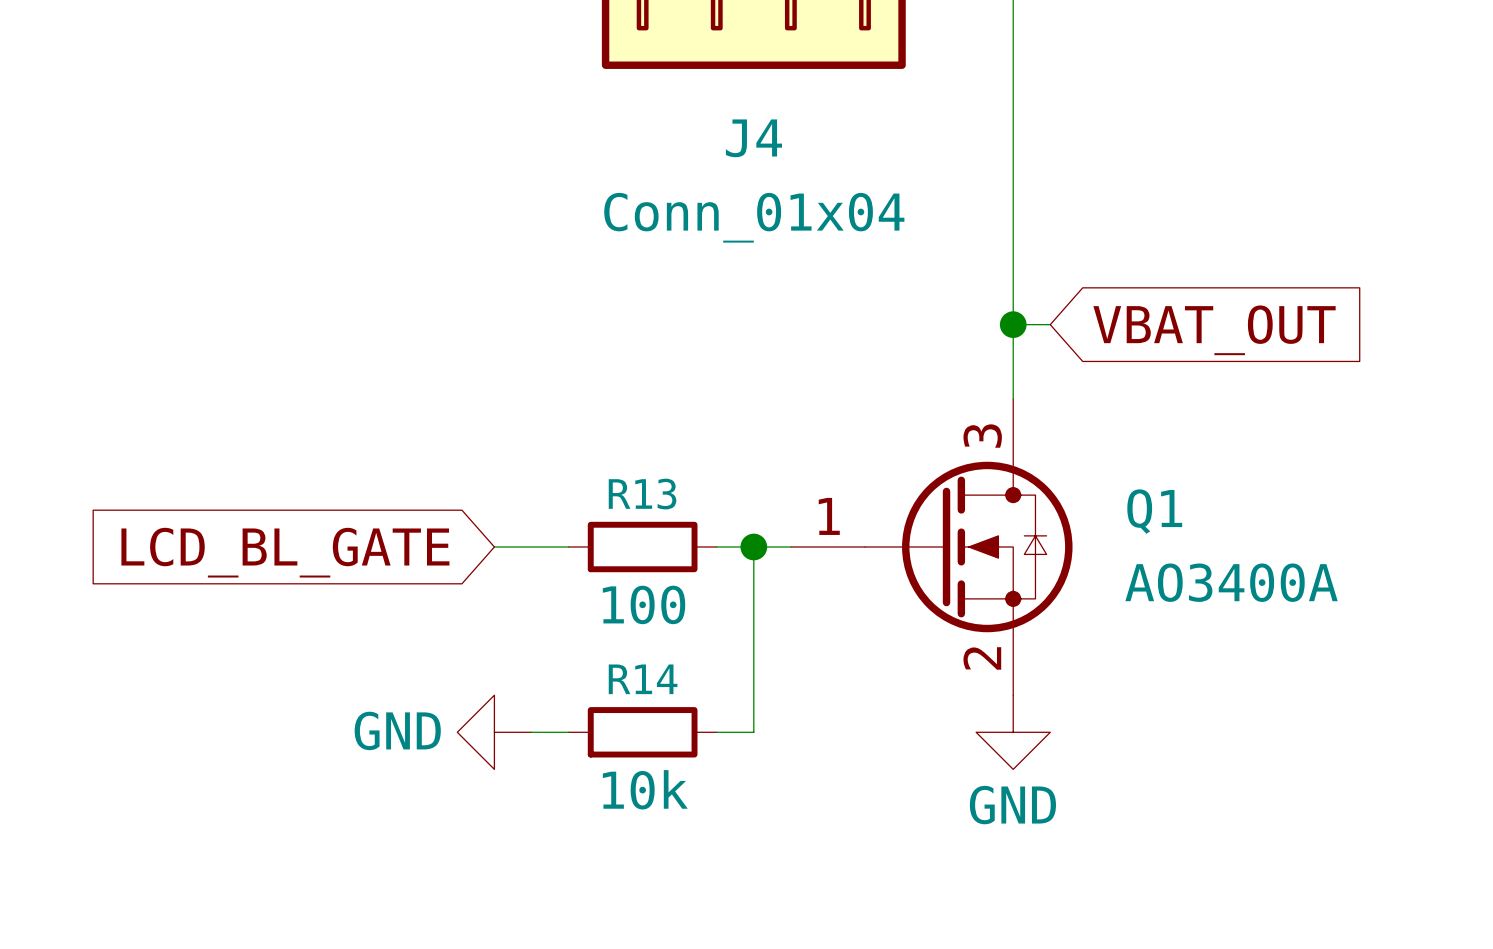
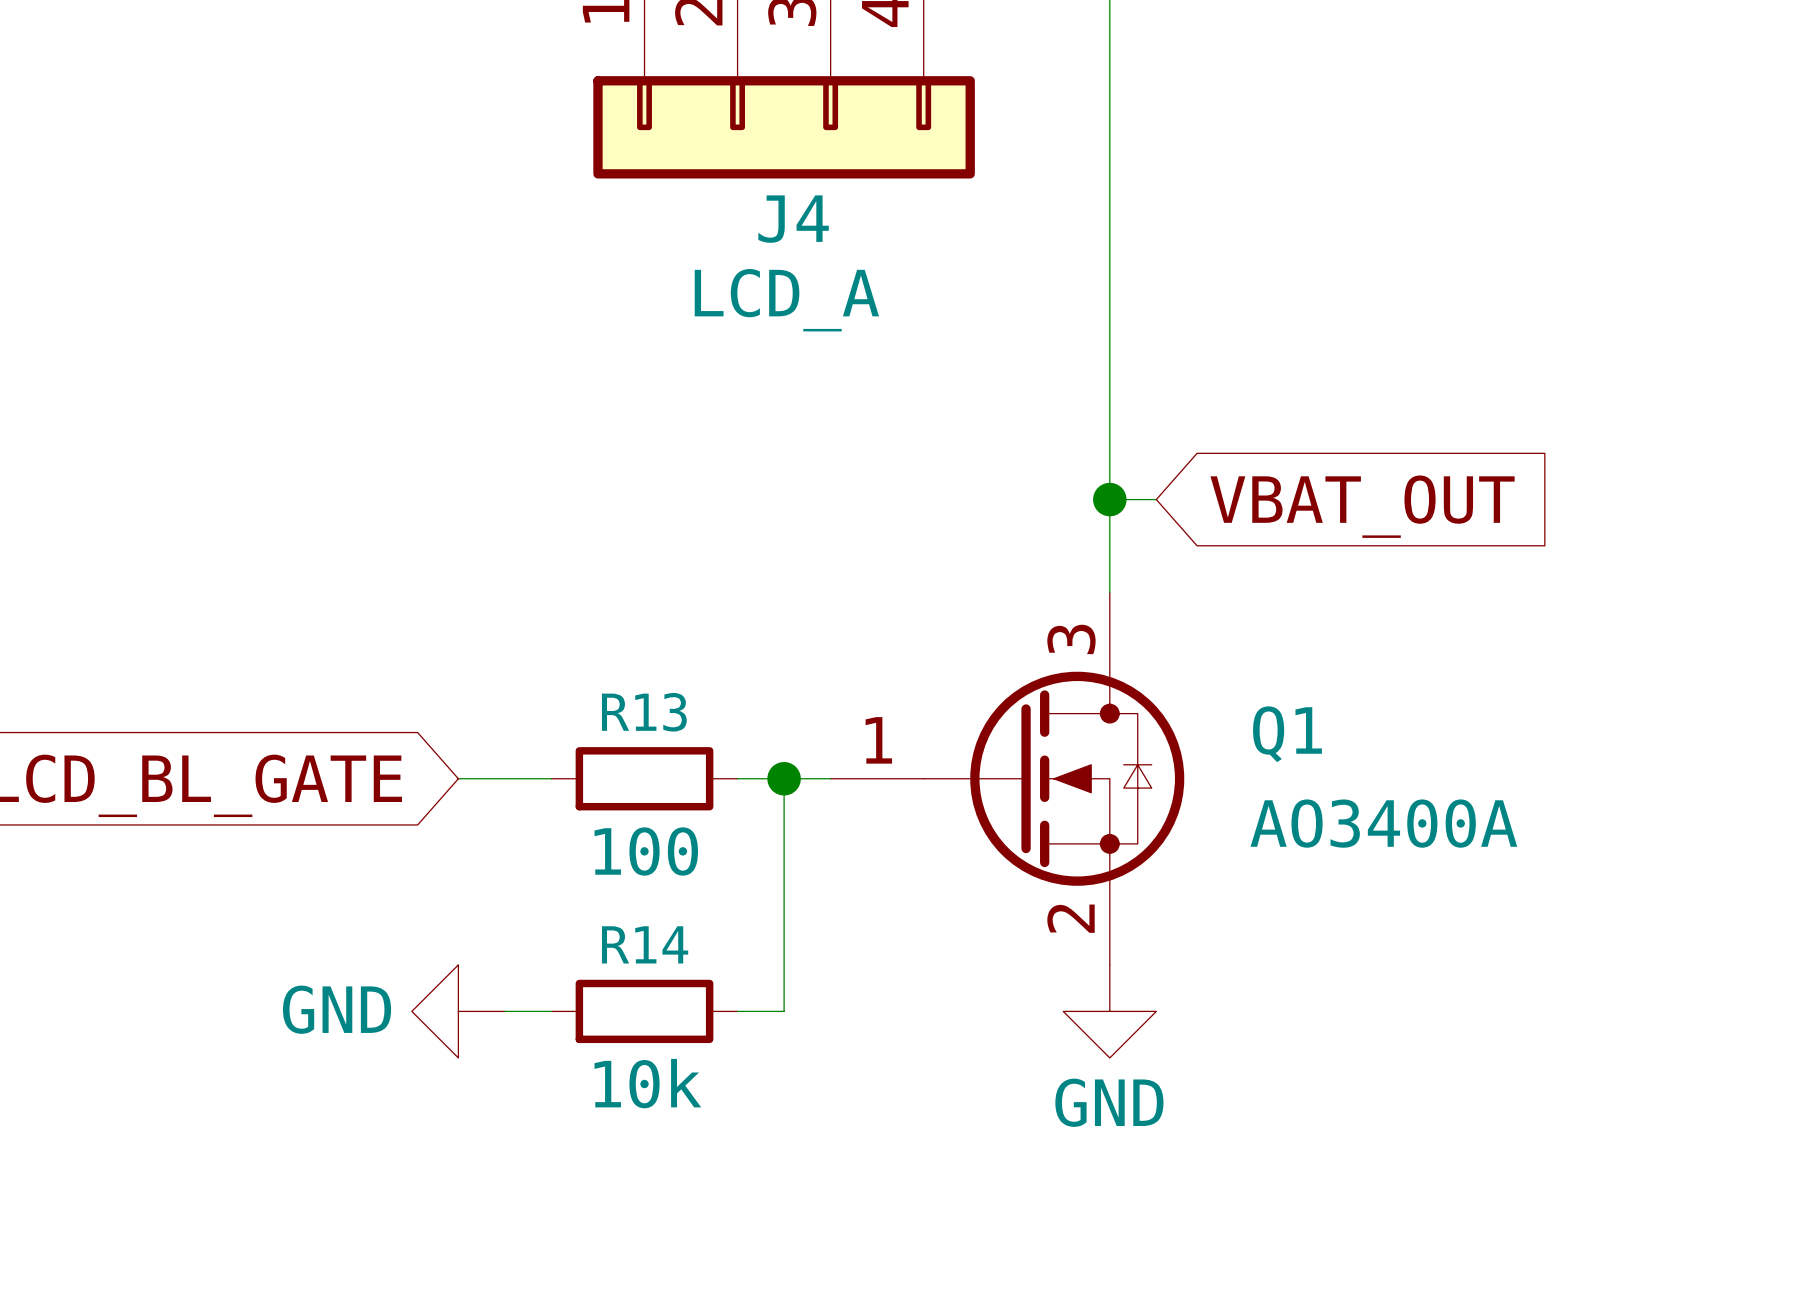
J4 name position: J4 (753, 138) -> J4 (793, 219)
J4 value: Conn_01x04 (754, 217) -> LCD_A (786, 300)

